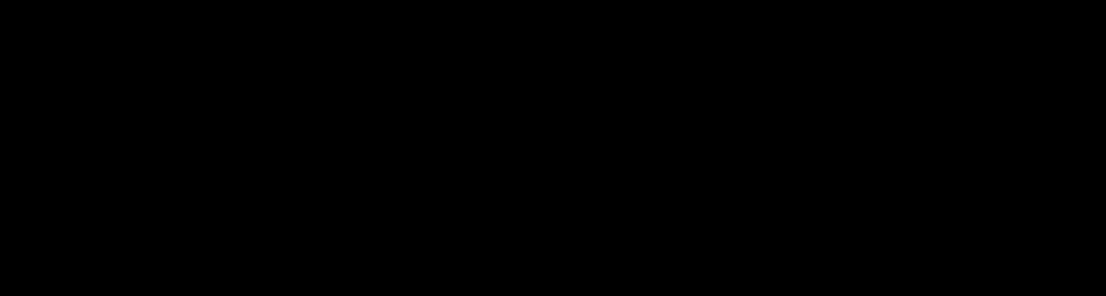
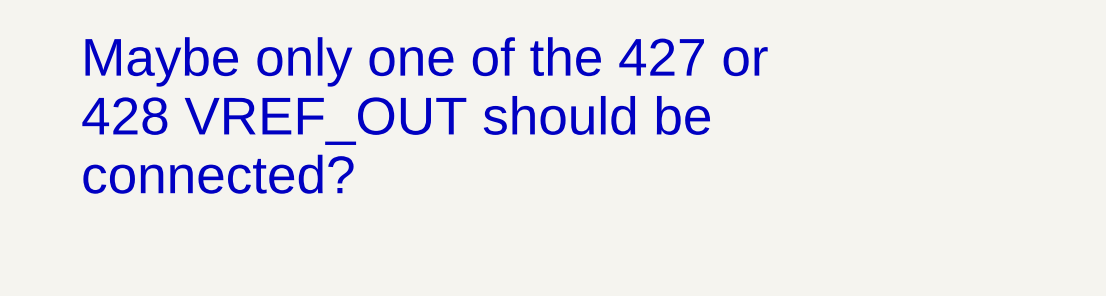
text: none -> Maybe only one of the 427 or (426, 61)
text: none -> 428 VREF_OUT should be (396, 120)
text: none -> connected? (218, 174)

